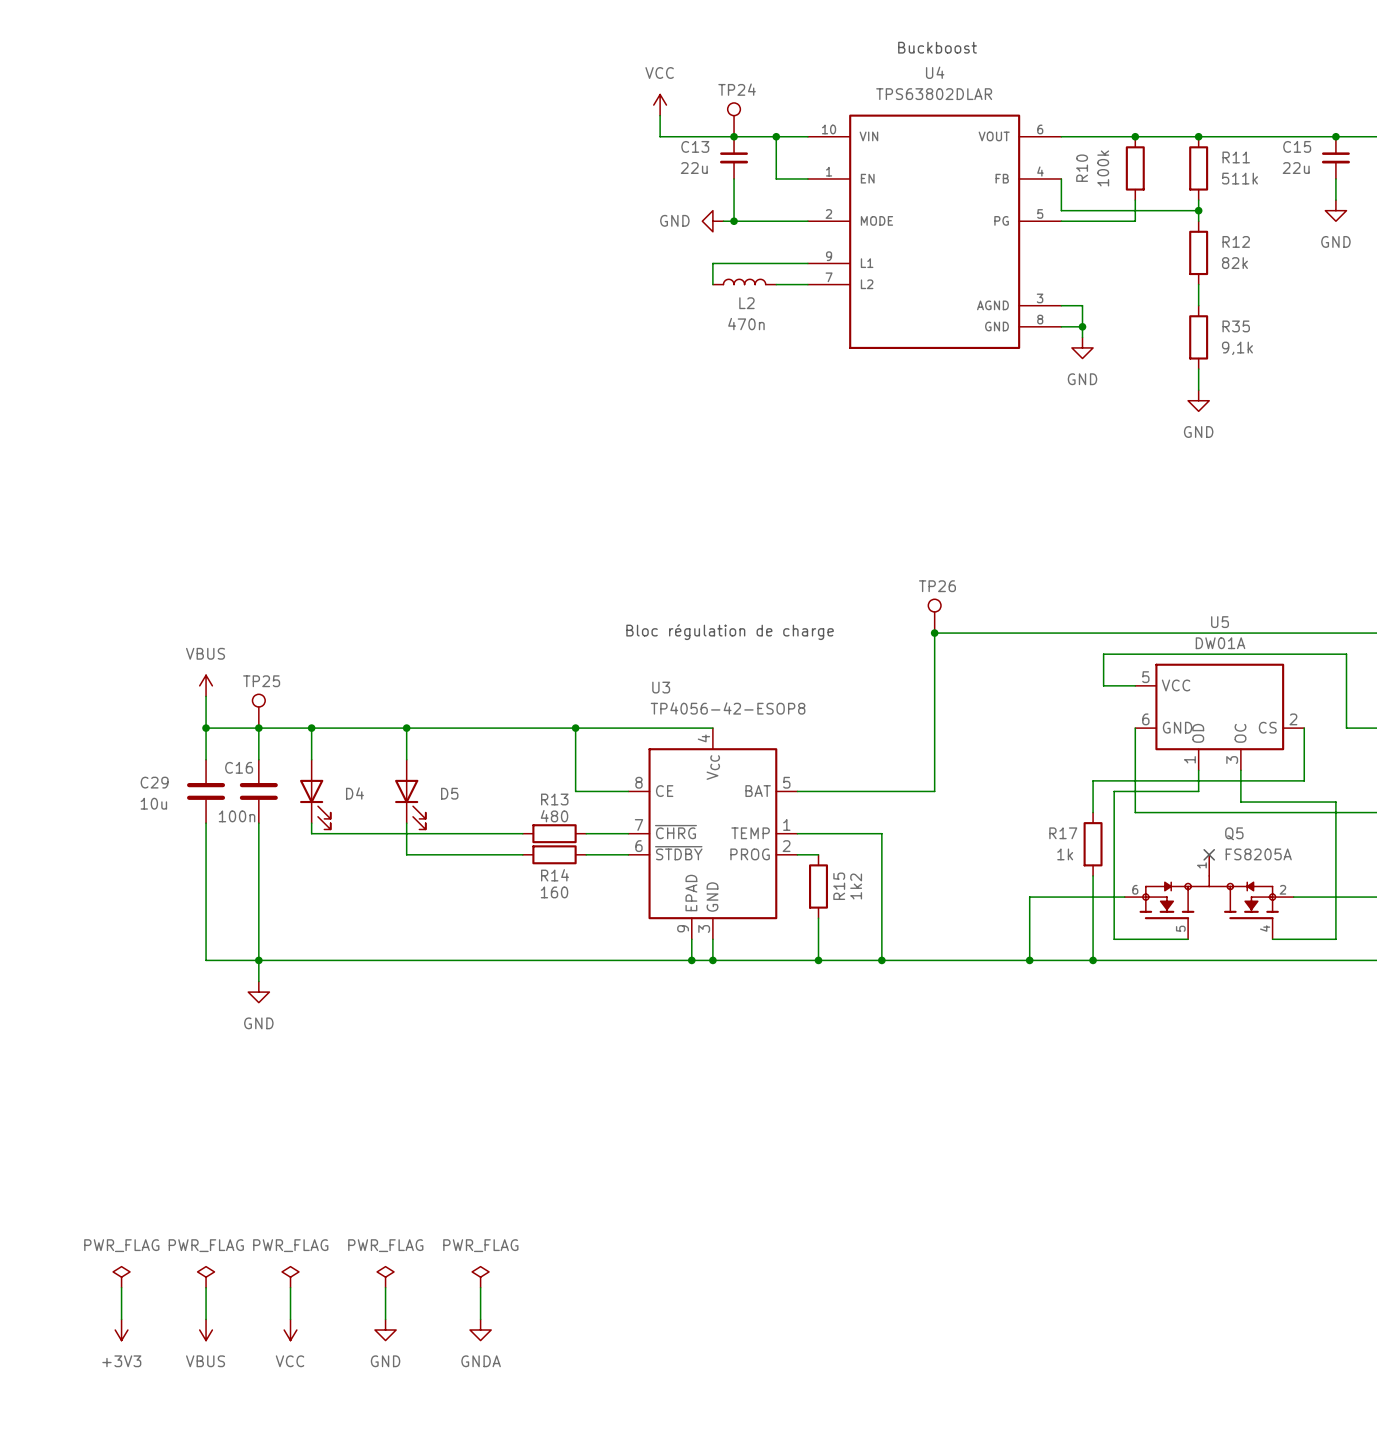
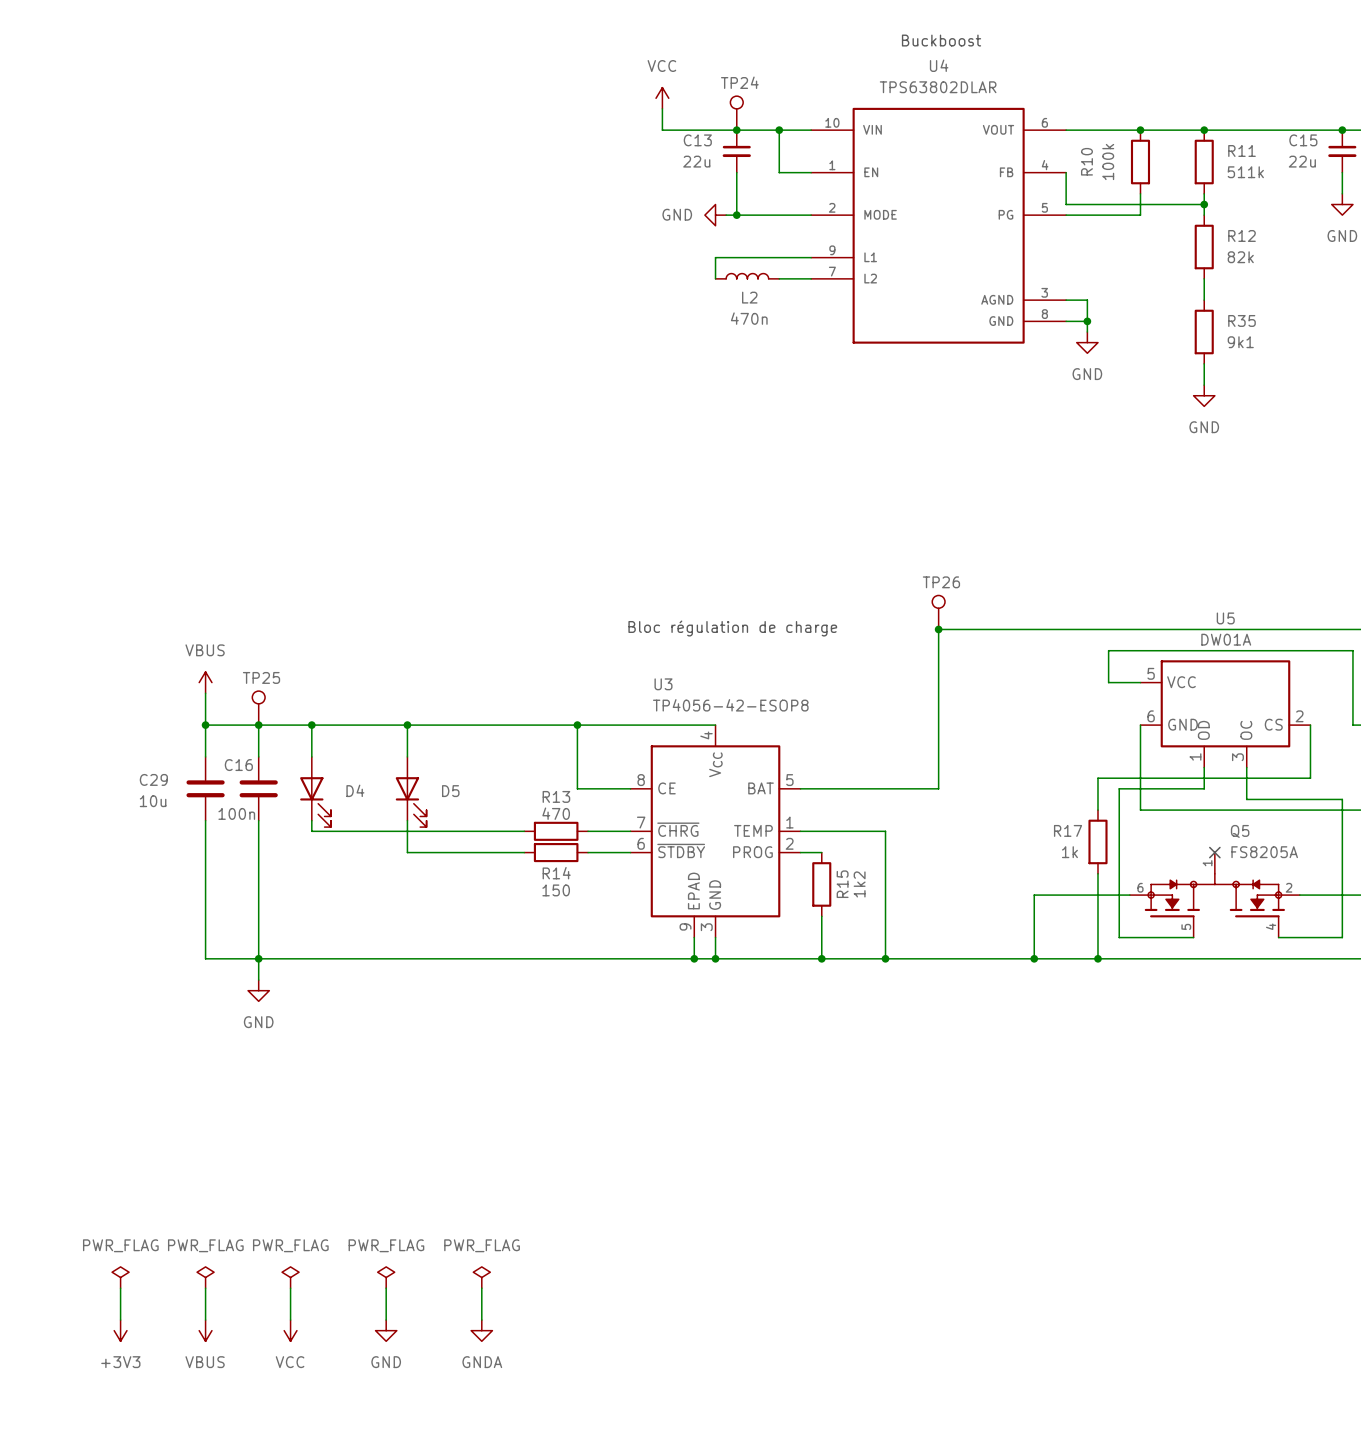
R35 value: 9,1k (1237, 348) -> 9k1 (1240, 342)
R13 value: 480 (554, 816) -> 470 (556, 813)
R14 value: 160 (554, 892) -> 150 (556, 890)

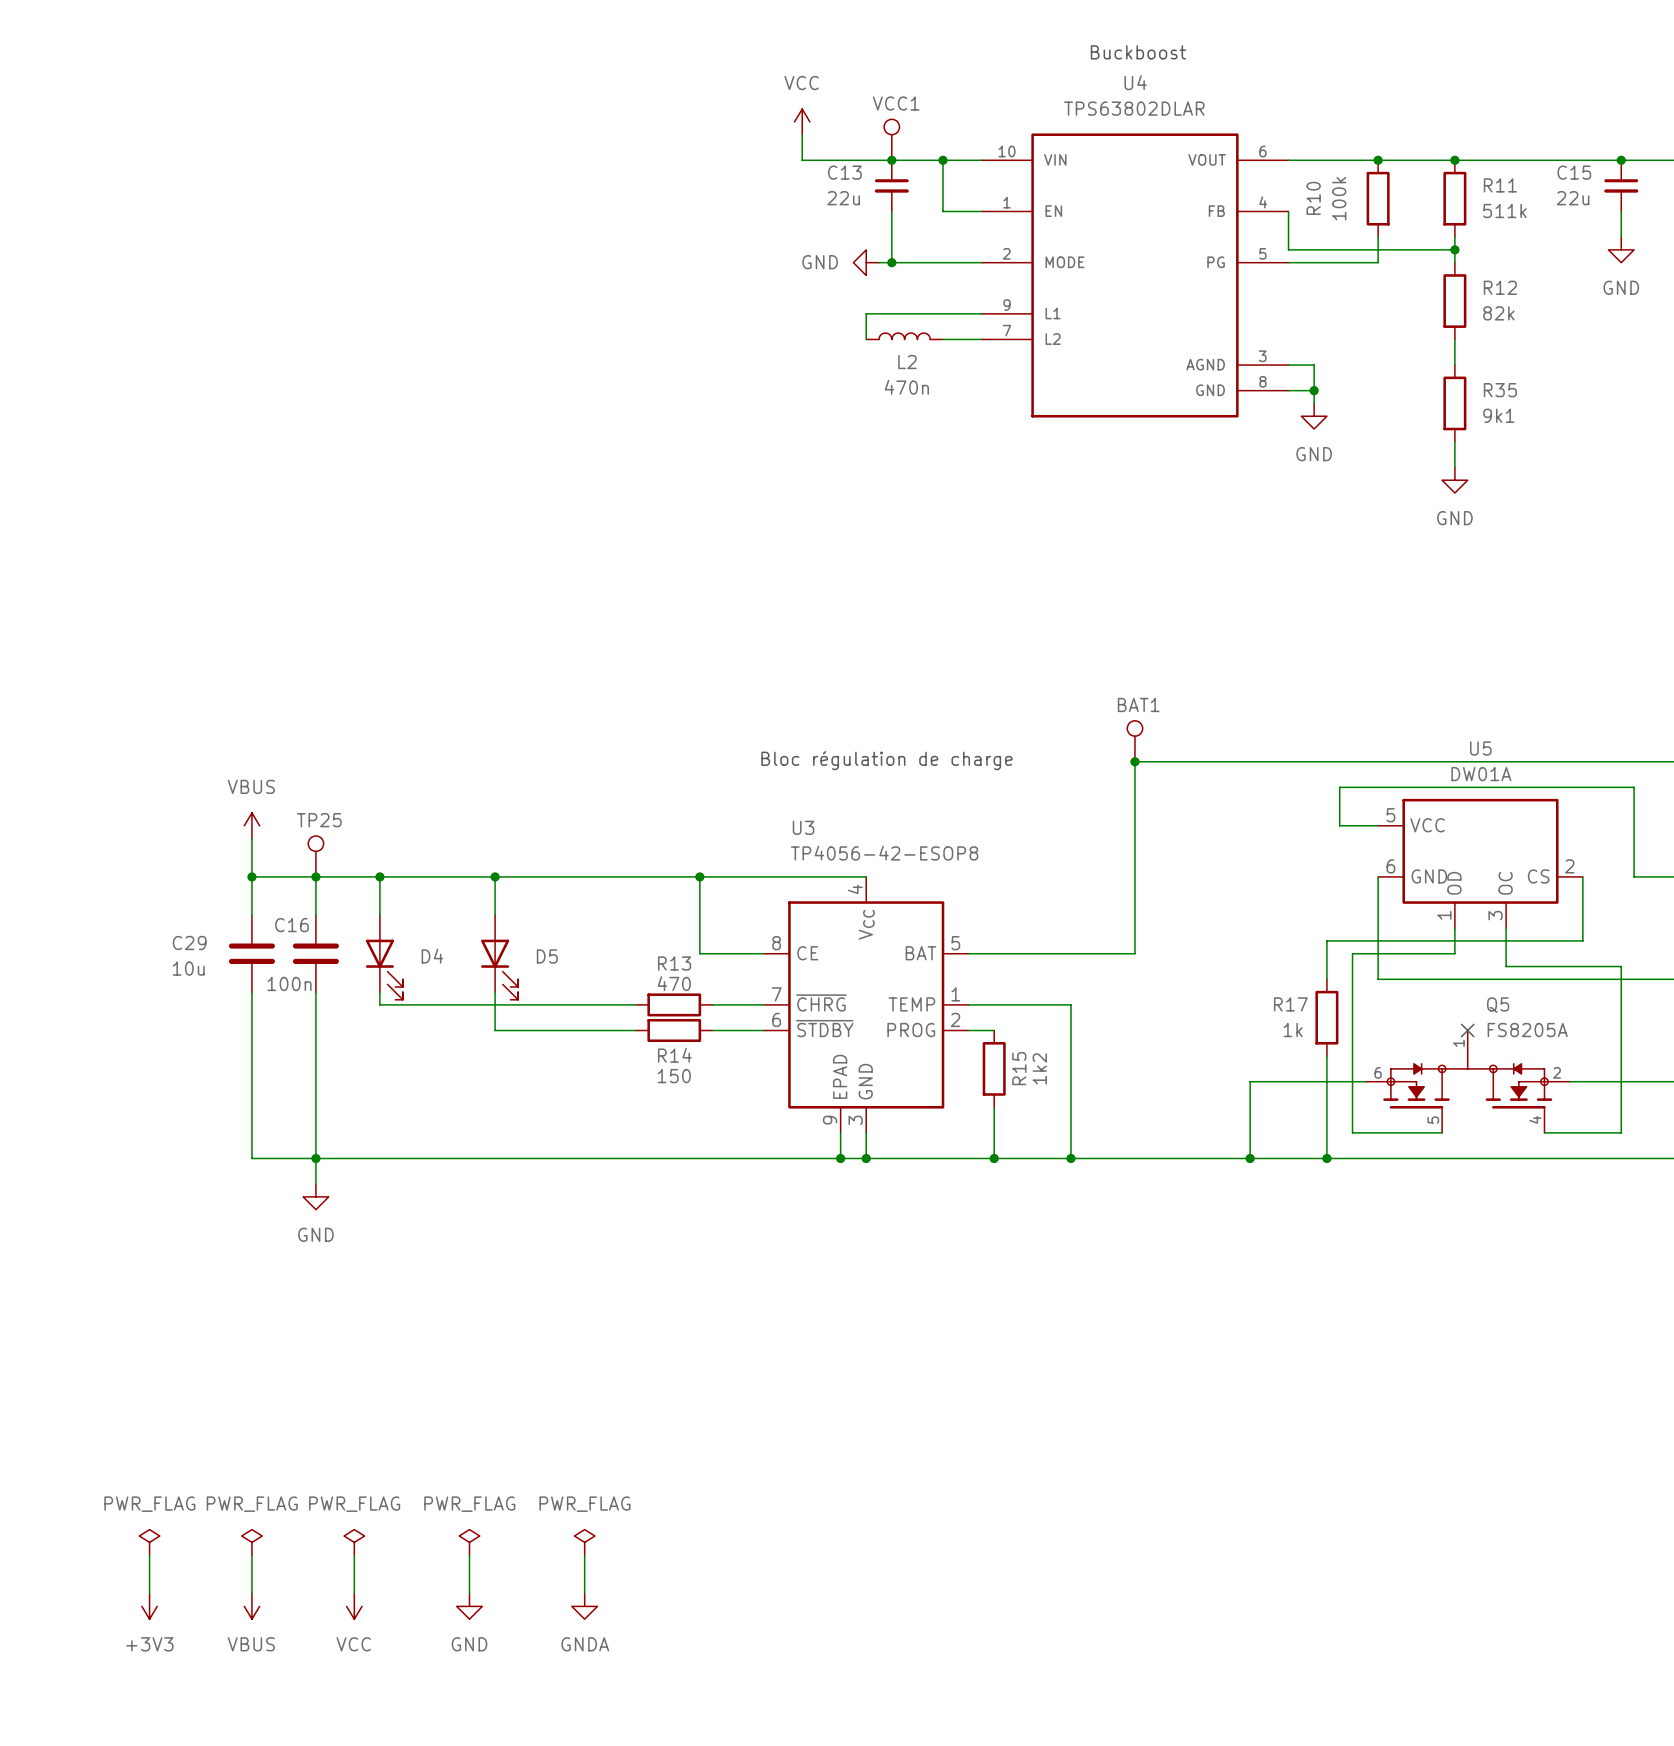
TP24 name: TP24 (739, 82) -> VCC1 (896, 103)
TP26 name: TP26 (941, 582) -> BAT1 (1138, 704)

